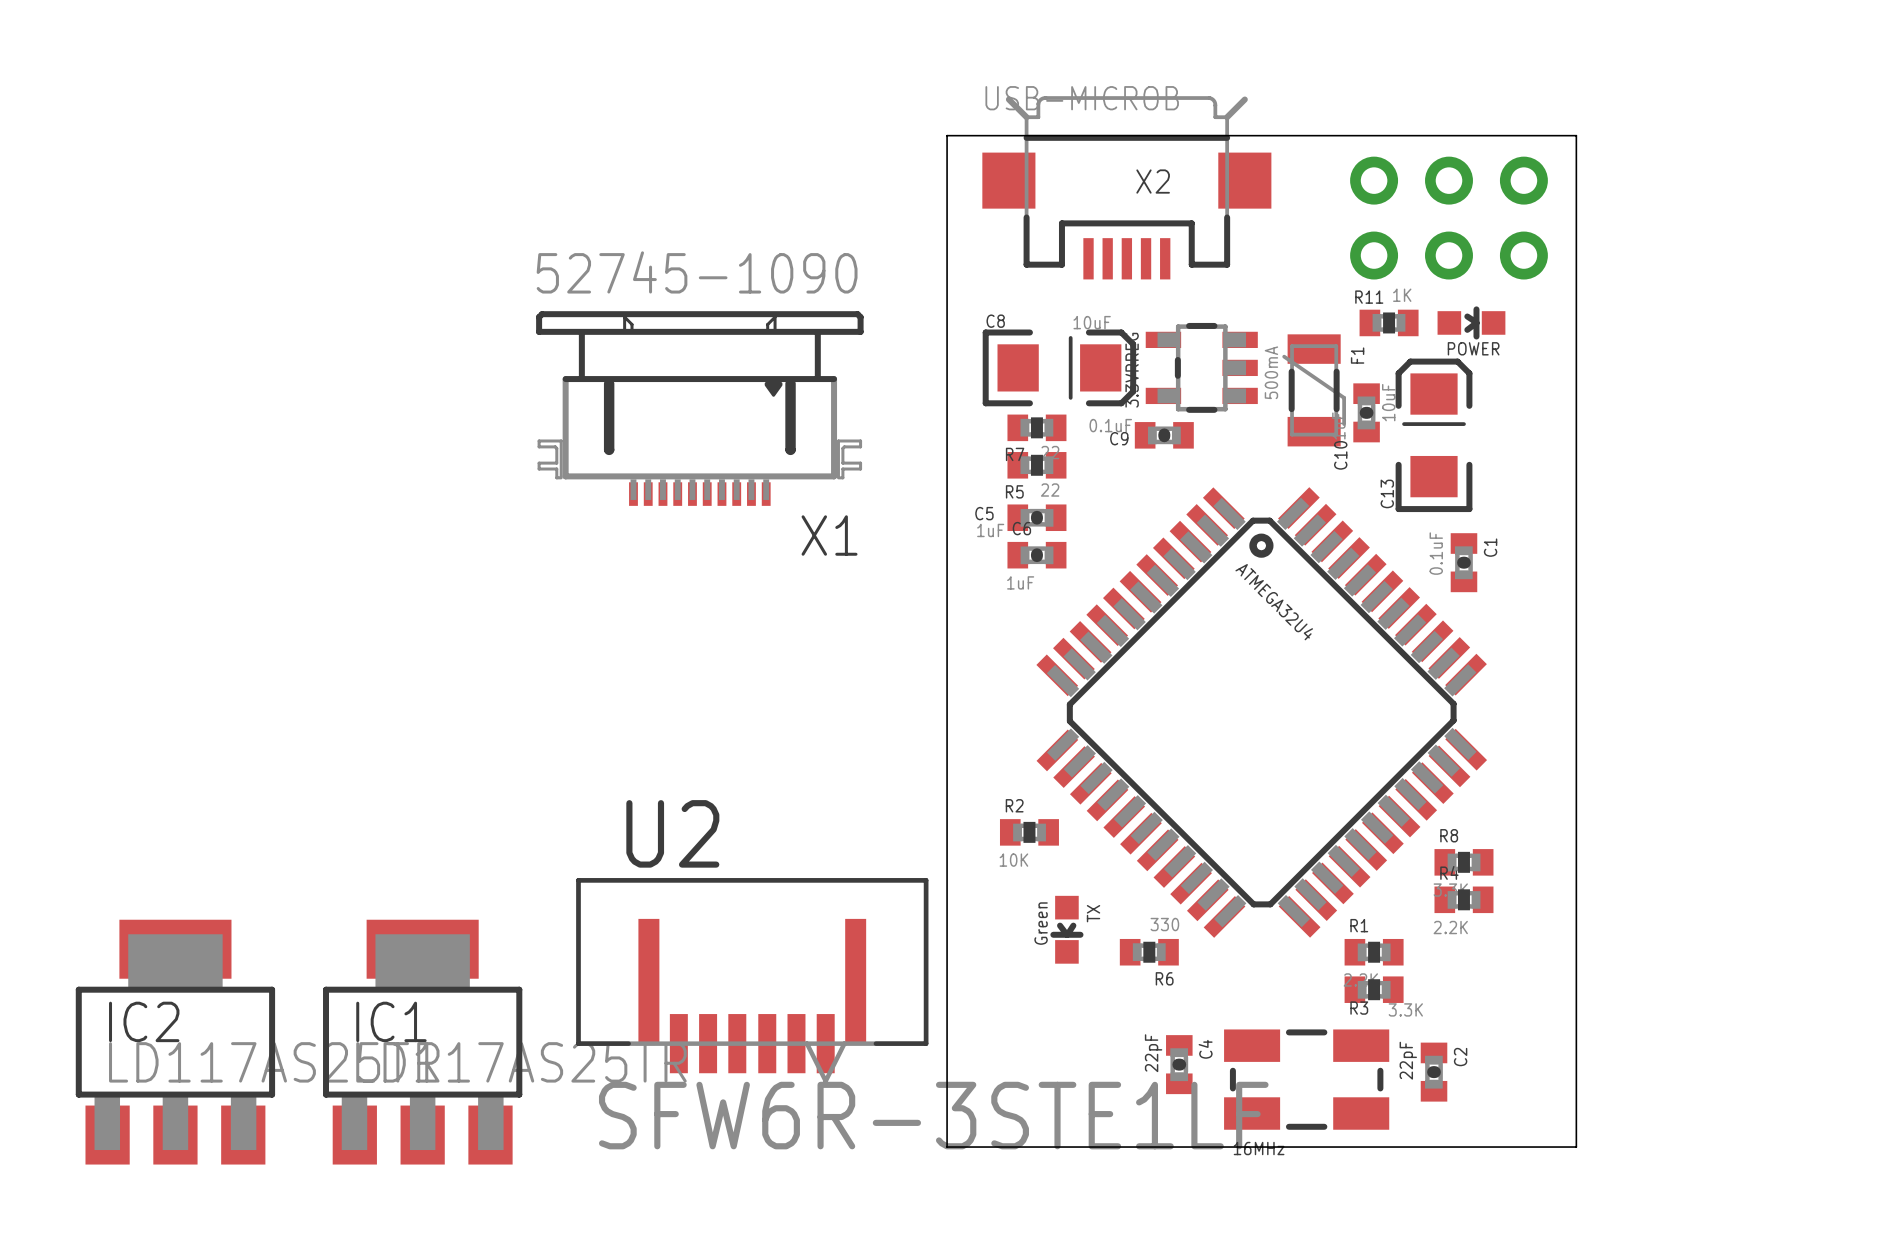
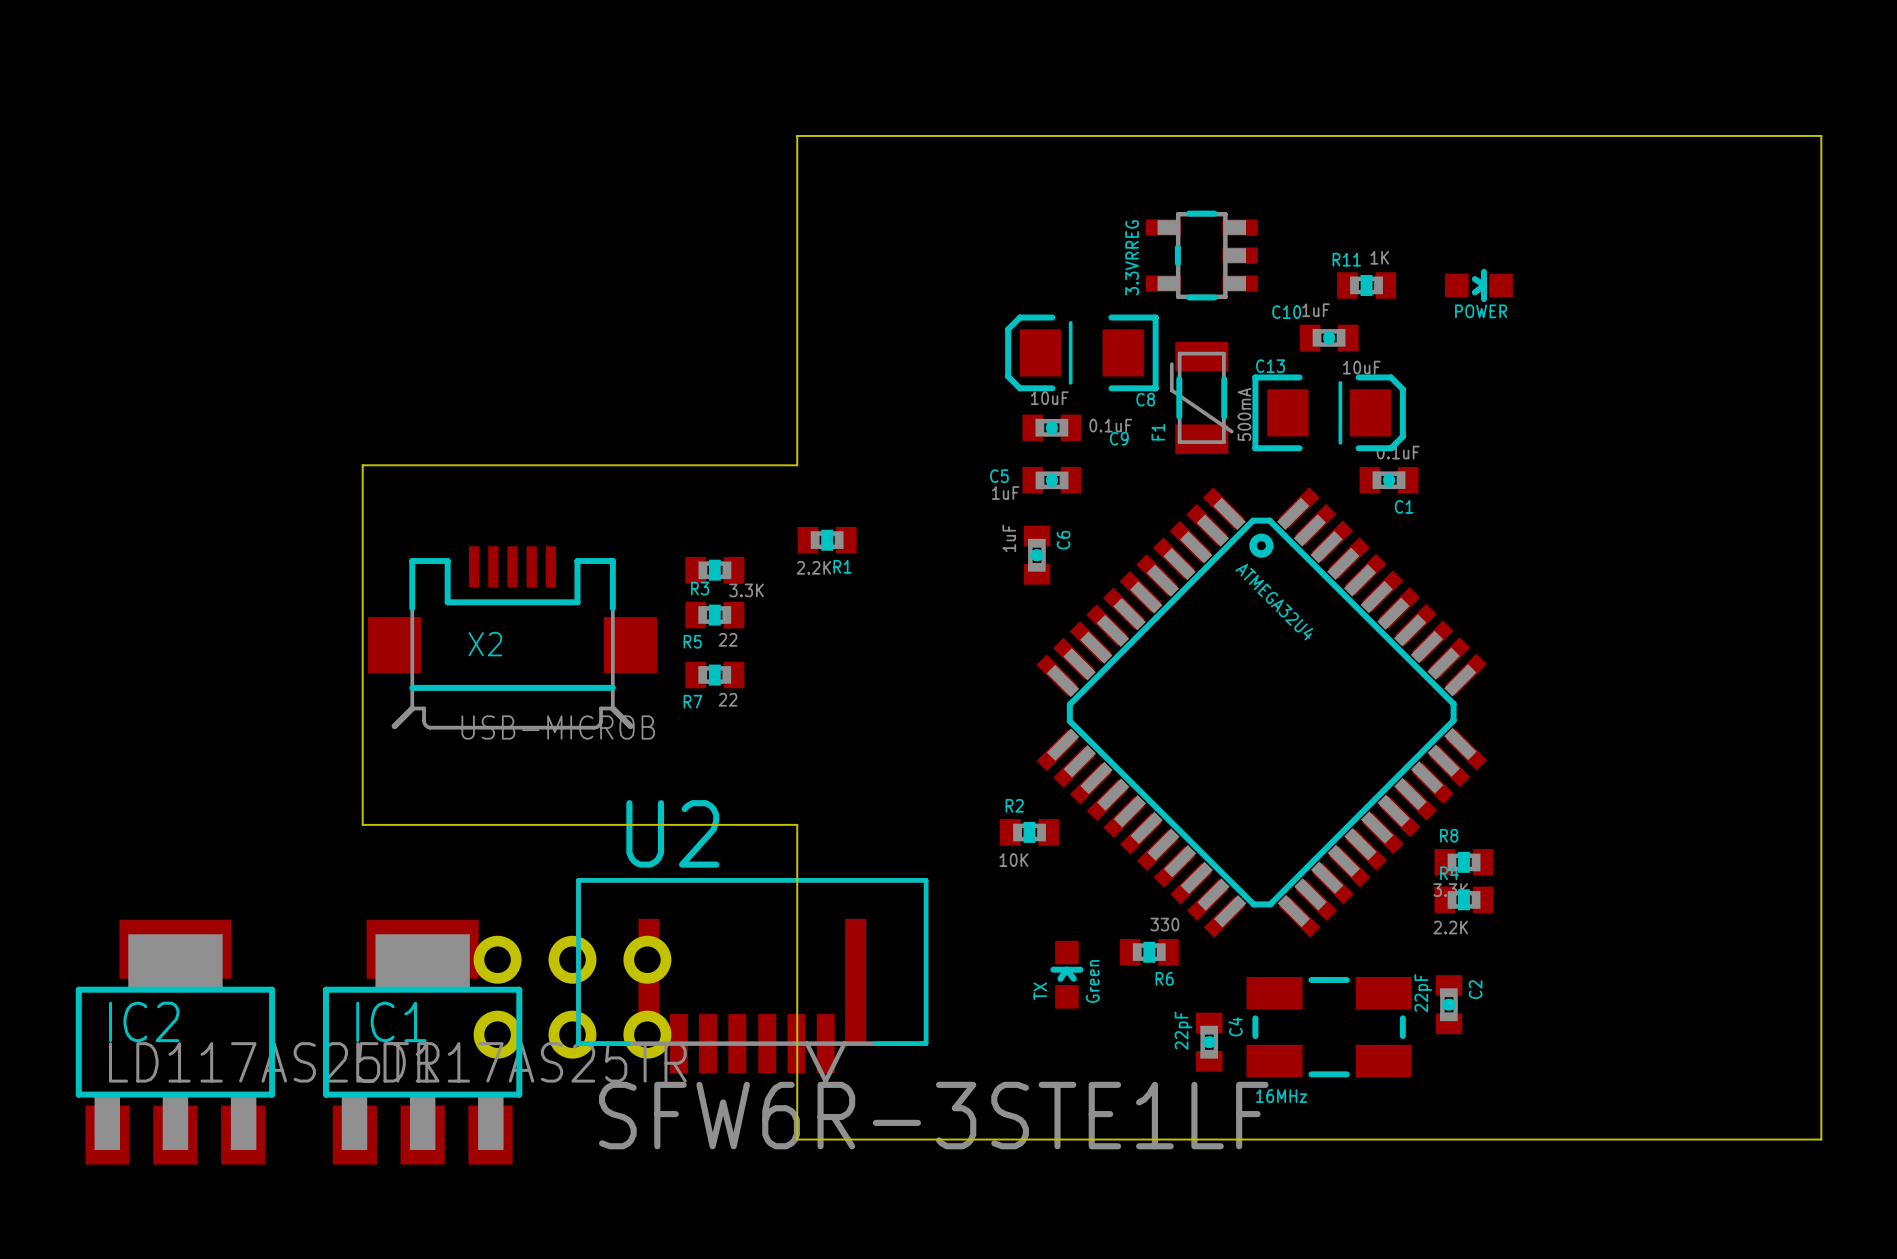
board edge: none -> (797, 135) (1821, 135) (1821, 1139) (797, 1139) (797, 824) (362, 824) (362, 465) (797, 465) (797, 135)
board edge: (947, 135) (947, 1147) (1576, 1147) (1576, 135) (947, 135) -> none
X2 rotation: 0° (1126, 187) -> 180° (512, 637)
X2 position: (1126, 187) -> (512, 637)
part: (1448, 218) -> none
R11 position: (1389, 322) -> (1366, 285)
POWER position: (1471, 322) -> (1478, 285)
C8 rotation: 0° (1059, 367) -> 180° (1081, 352)
3.3VRREG position: (1201, 367) -> (1201, 255)
F1 rotation: 0° (1314, 390) -> 180° (1201, 397)
F1 position: (1314, 390) -> (1201, 397)
X1: 52745-1090 (699, 408) -> none
C10 rotation: 0° (1366, 412) -> 90° clockwise (1329, 337)
C10 position: (1366, 412) -> (1329, 337)
R7 position: (1036, 427) -> (714, 675)
C9 position: (1164, 435) -> (1051, 427)
C13 rotation: 0° (1434, 435) -> 90° clockwise (1329, 412)
C13 position: (1434, 435) -> (1329, 412)
R5 position: (1036, 465) -> (714, 615)
C5 position: (1036, 517) -> (1051, 480)
C6 rotation: 0° (1036, 555) -> 90° clockwise (1036, 555)
C1 rotation: 0° (1463, 562) -> 90° clockwise (1389, 480)
C1 position: (1463, 562) -> (1389, 480)
R1 name position: R1 (1359, 925) -> R1 (842, 566)
TX rotation: 0° (1066, 929) -> 180° (1066, 974)
TX position: (1066, 929) -> (1066, 974)
R1 position: (1374, 952) -> (827, 540)
R3 position: (1374, 989) -> (714, 570)
part: none -> (572, 997)
C4 position: (1179, 1064) -> (1209, 1042)
C2 position: (1434, 1072) -> (1448, 1004)
part position: (1306, 1079) -> (1329, 1027)

